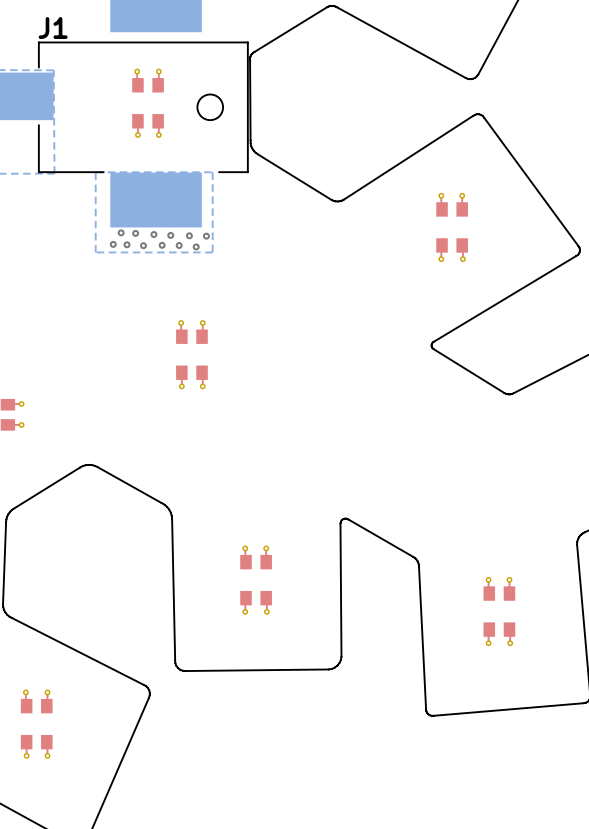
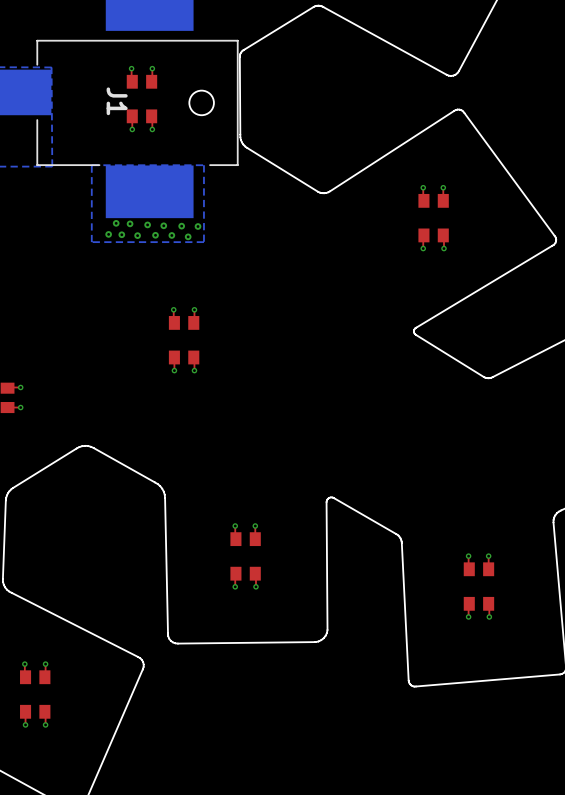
J1 name rotation: 0° (53, 28) -> 90° clockwise (117, 101)
J1 name position: J1 (53, 28) -> J1 (117, 101)

